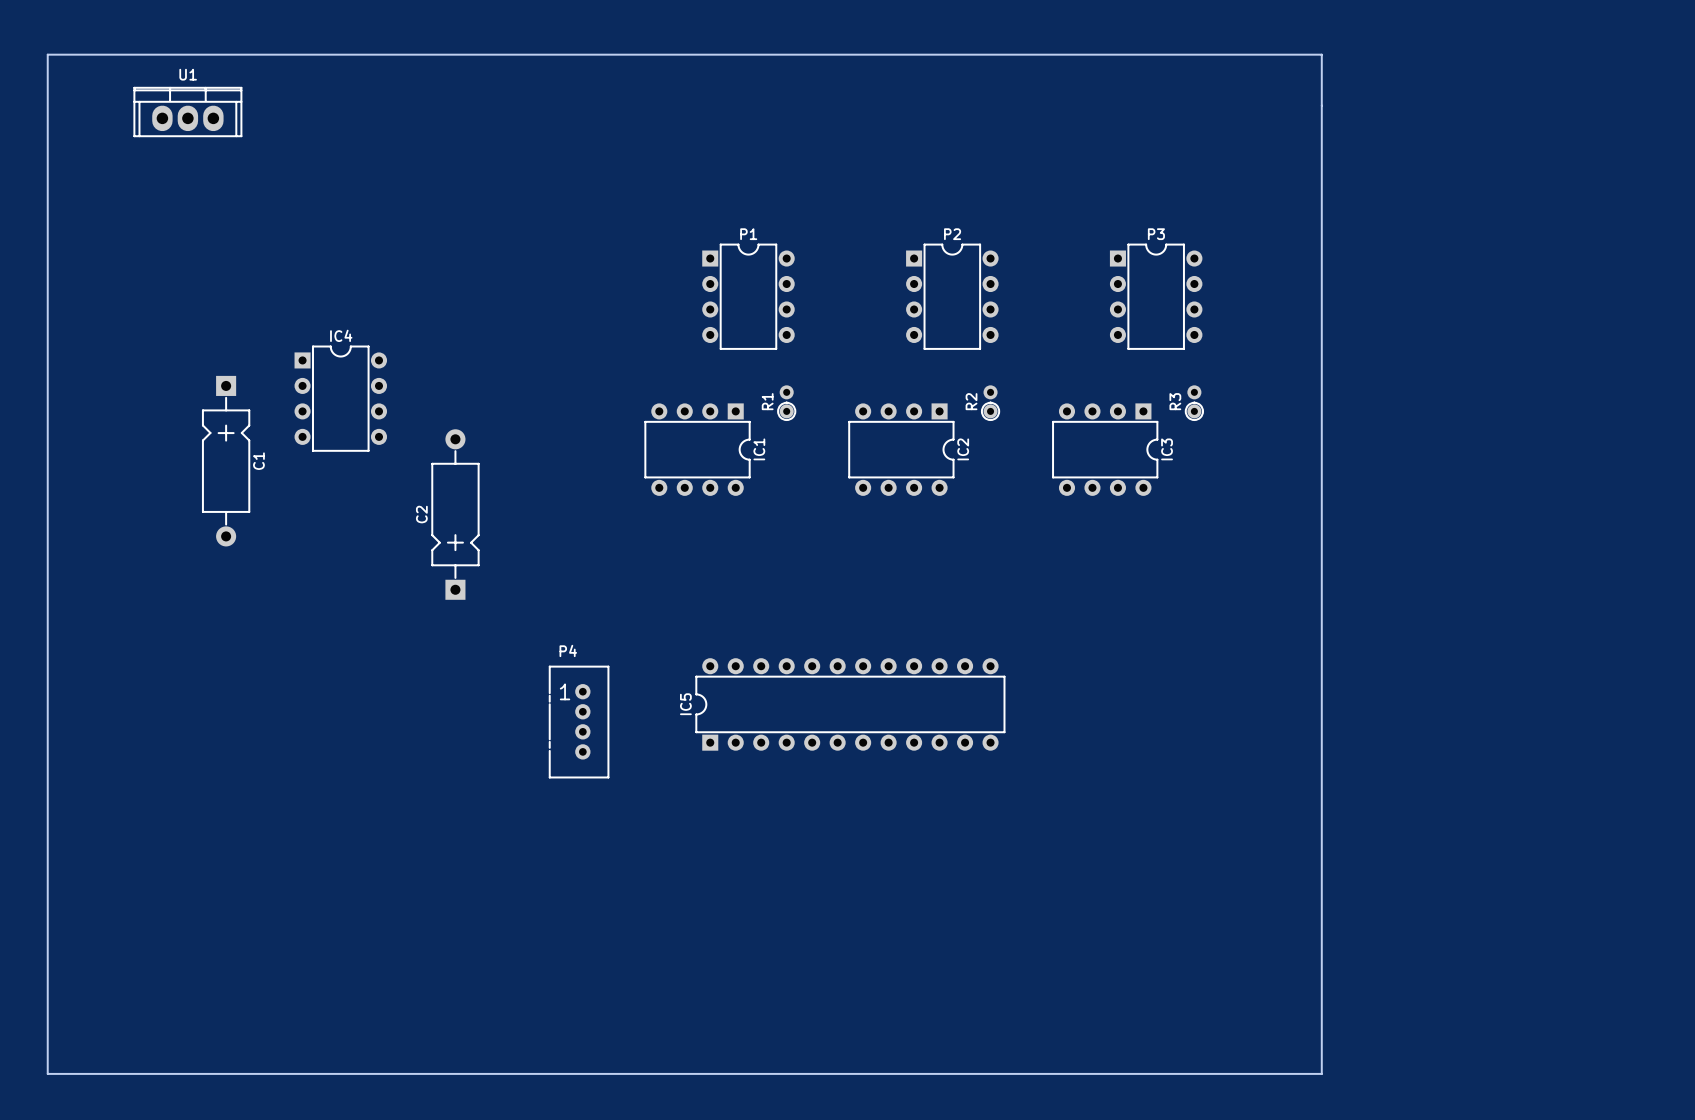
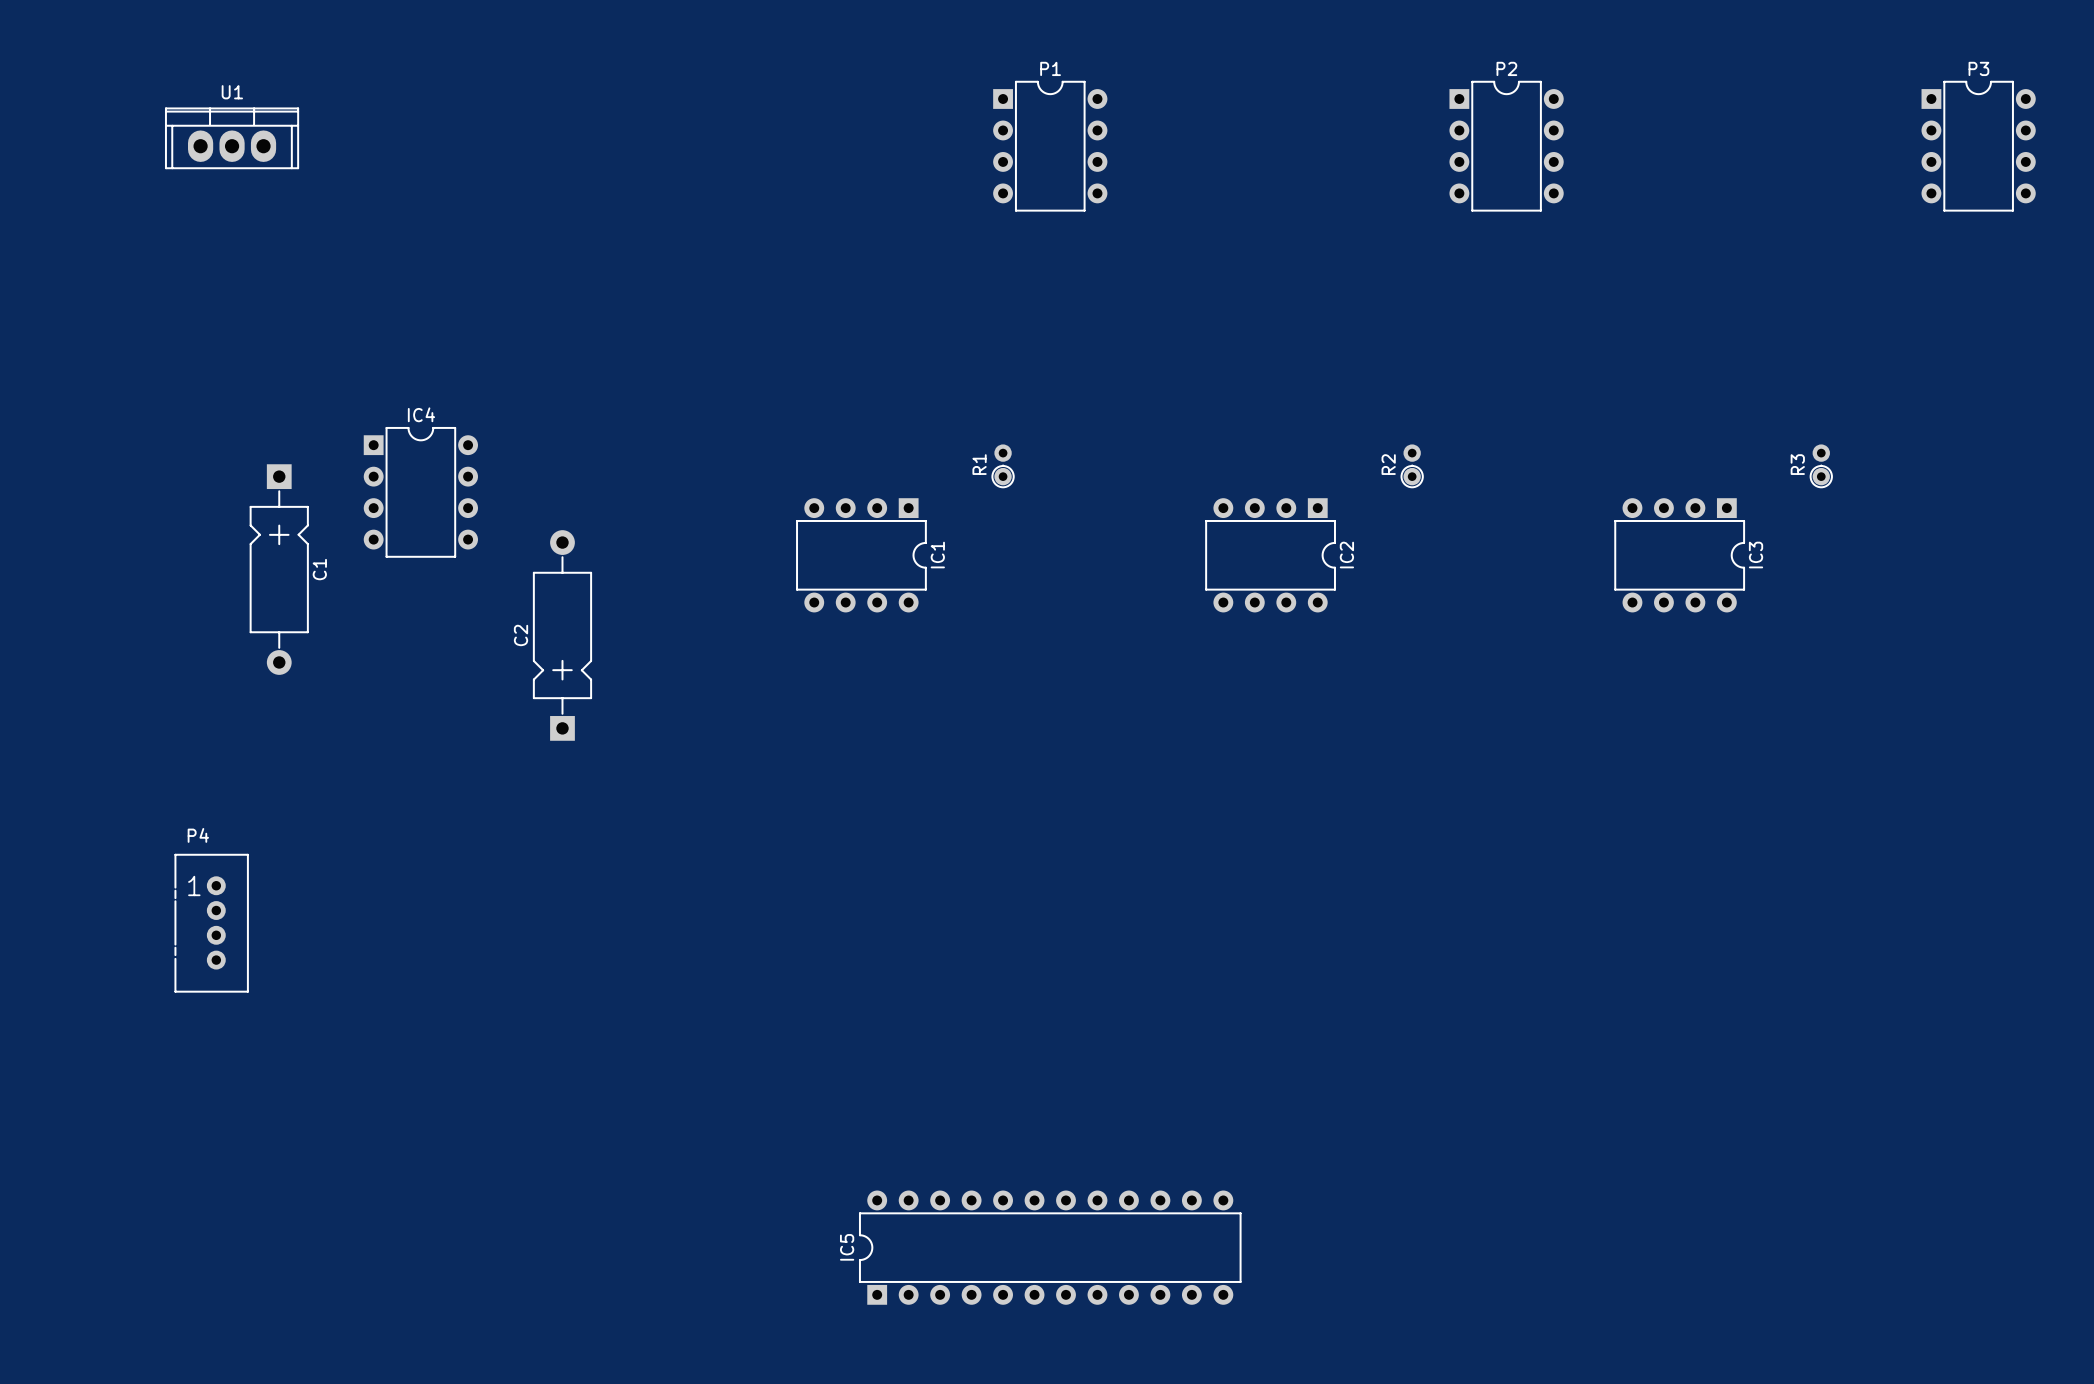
board edge: (47, 54) (1321, 54) (1321, 1073) (47, 1073) (47, 54) -> none
P1 position: (748, 296) -> (1050, 146)
P2 position: (952, 296) -> (1506, 146)
P3 position: (1156, 296) -> (1978, 146)
R1 position: (786, 402) -> (1003, 466)
R2 position: (990, 402) -> (1412, 466)
R3 position: (1194, 402) -> (1821, 466)
IC2 position: (901, 449) -> (1270, 555)
IC3 position: (1105, 449) -> (1679, 555)
IC5 position: (850, 704) -> (1050, 1247)
P4 position: (579, 722) -> (211, 923)

